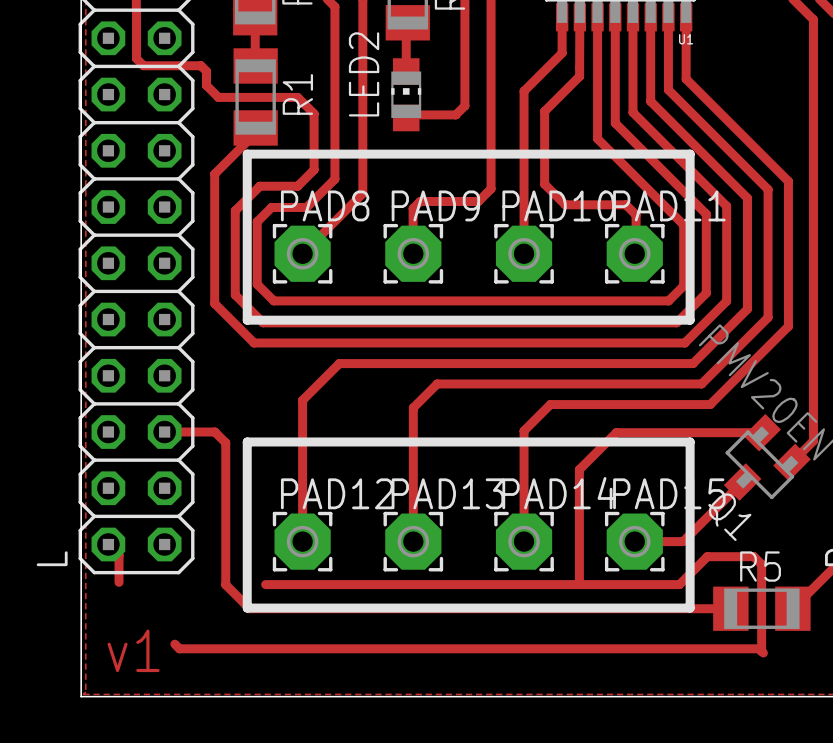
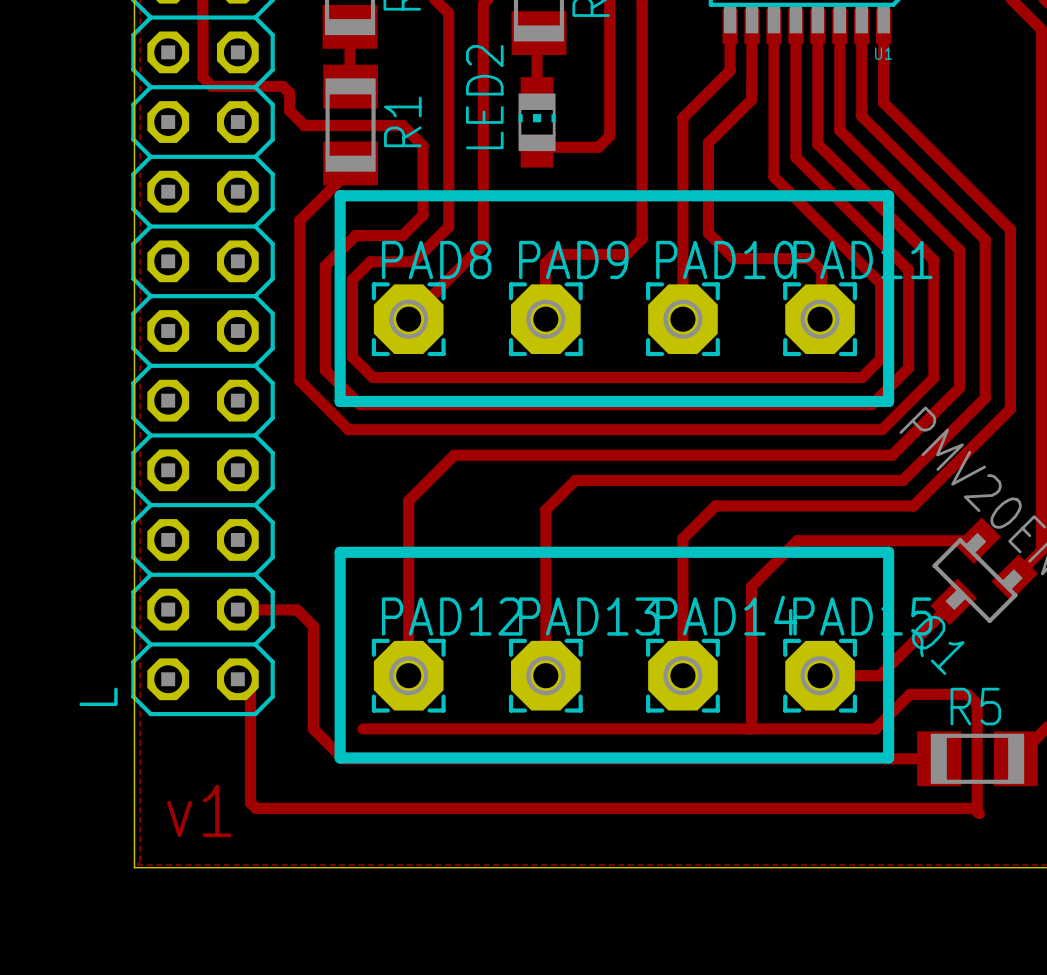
track: (164, 432) (214, 432) (225, 442) (225, 501) -> (238, 609) (297, 609) (313, 626)
track: (108, 544) (119, 555) (119, 582) -> none
track: none -> (237, 679) (250, 691) (250, 802)

